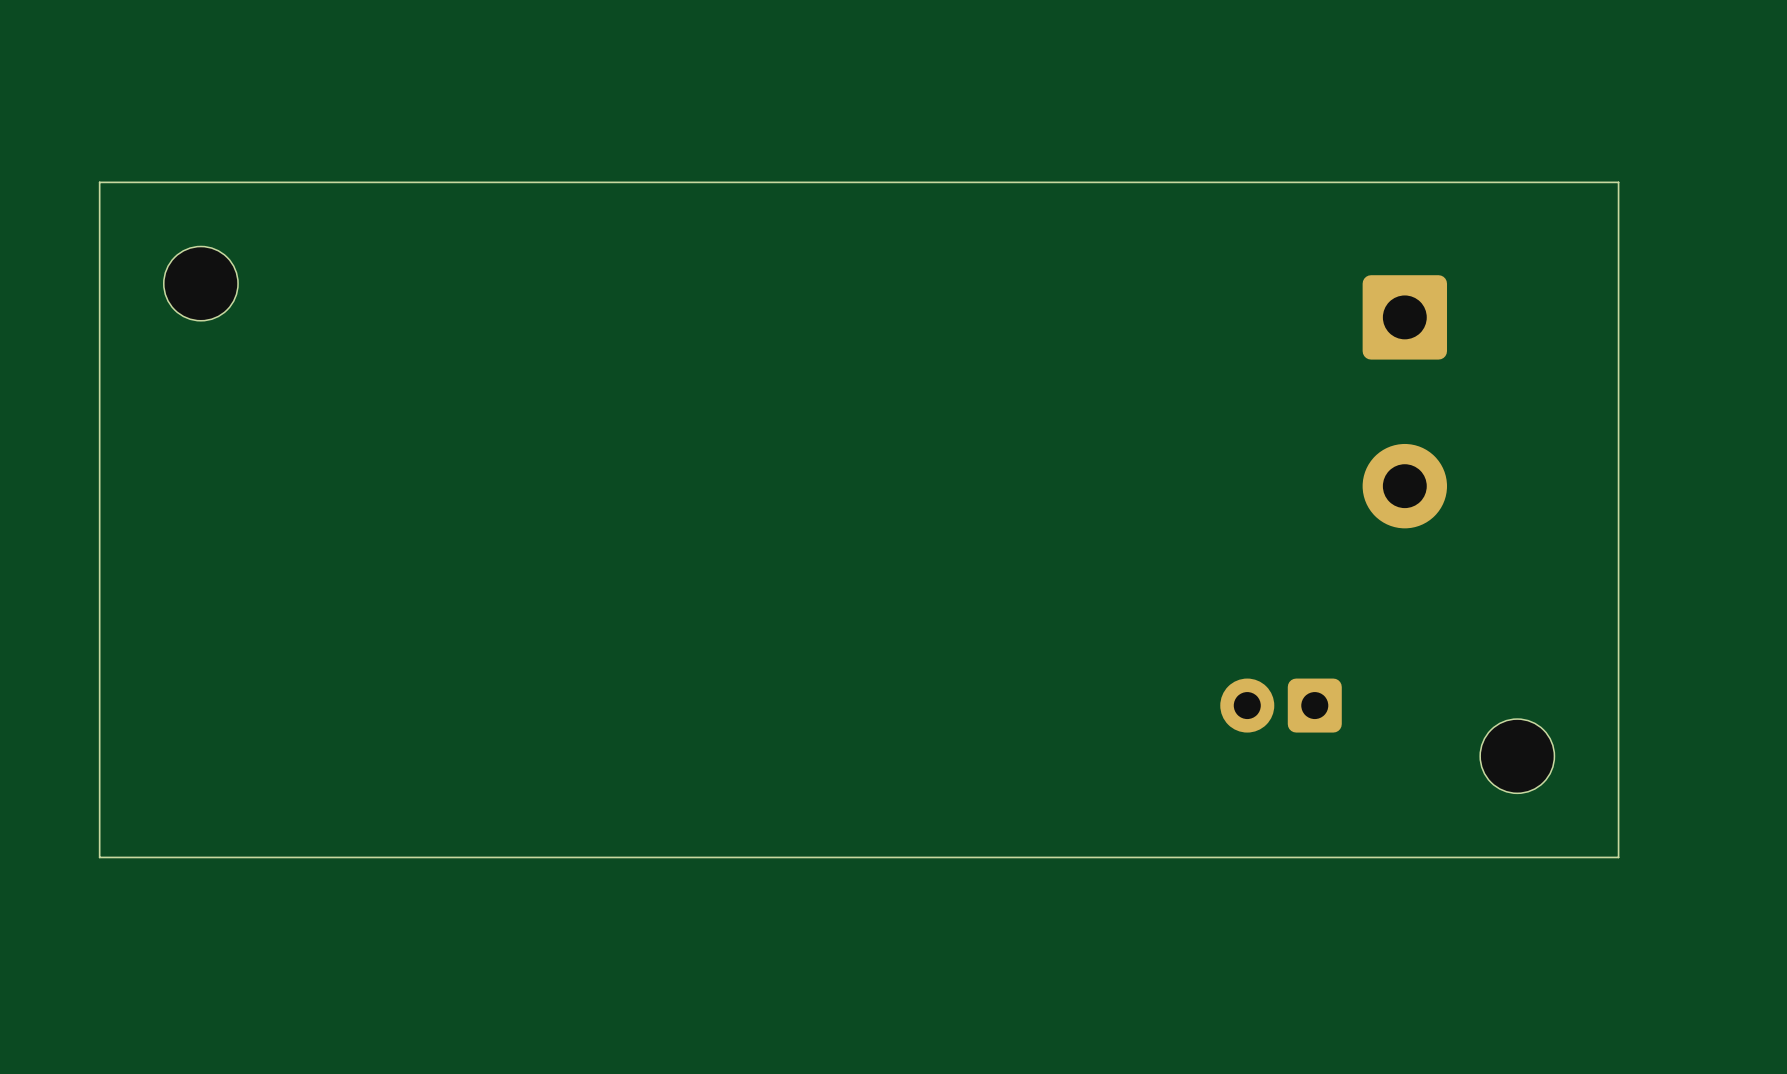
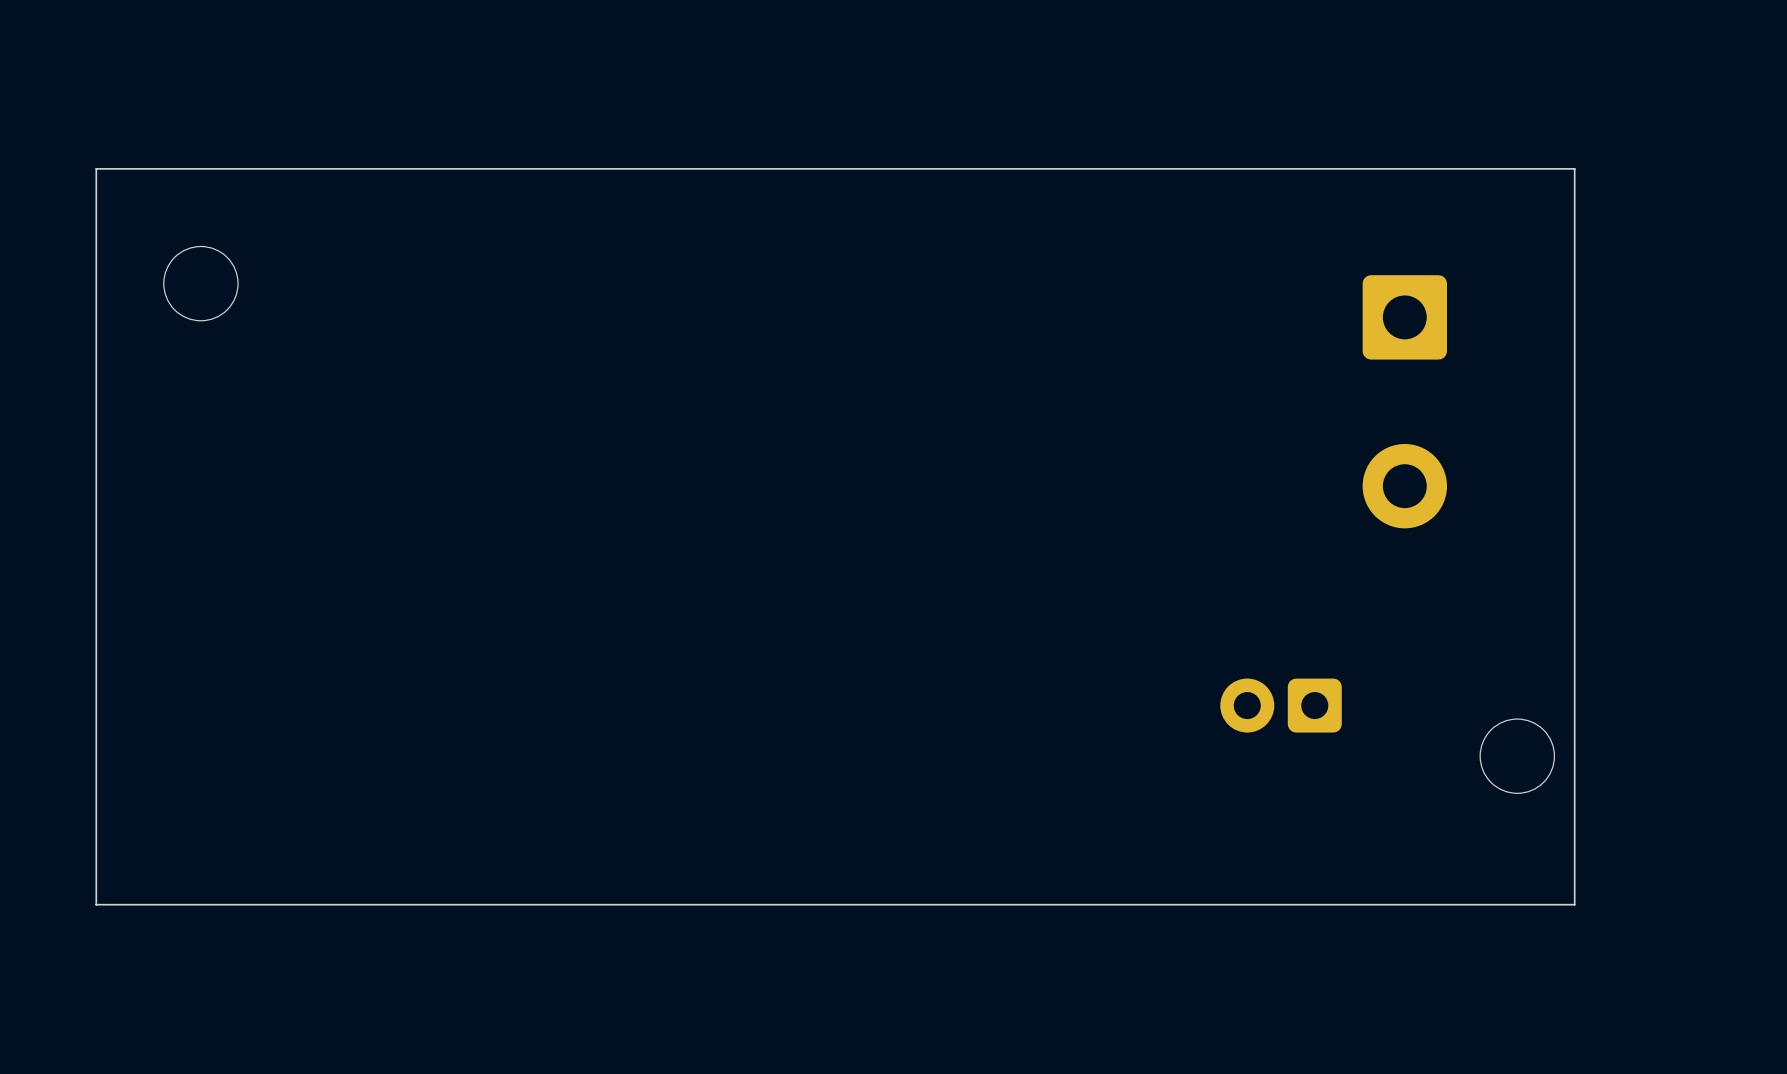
board edge: (1618, 182) (99, 182) (99, 857) (1618, 857) (1618, 182) -> (1574, 168) (1574, 904) (96, 904) (96, 168) (1574, 168)

